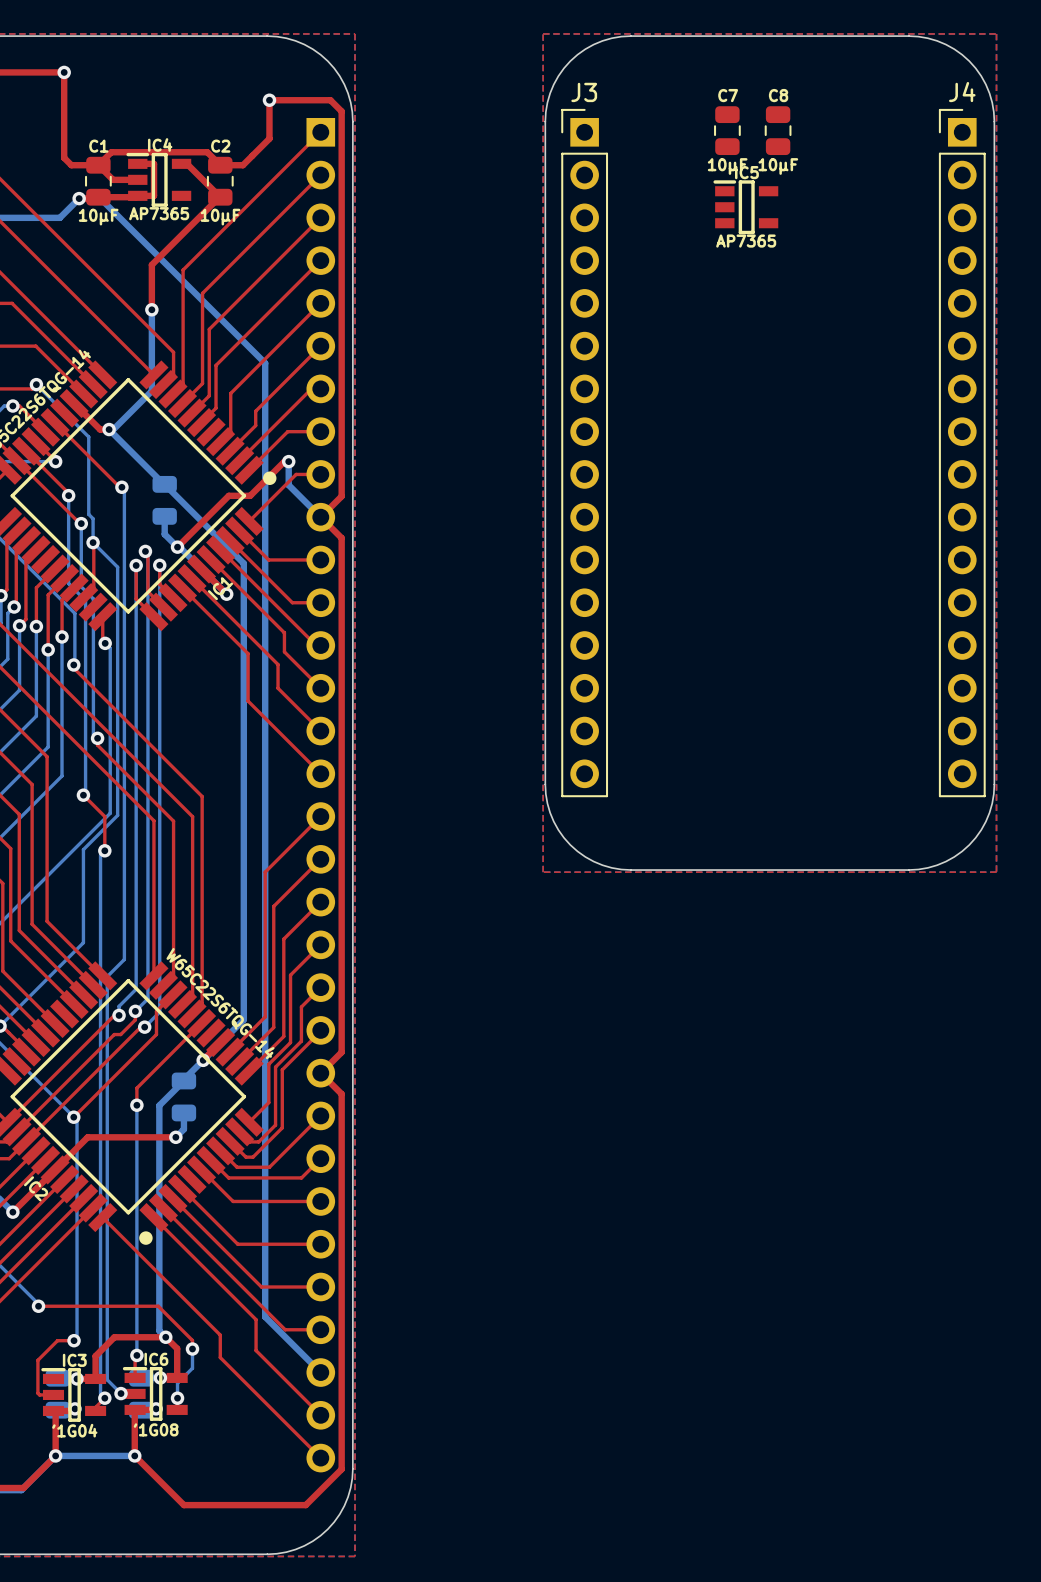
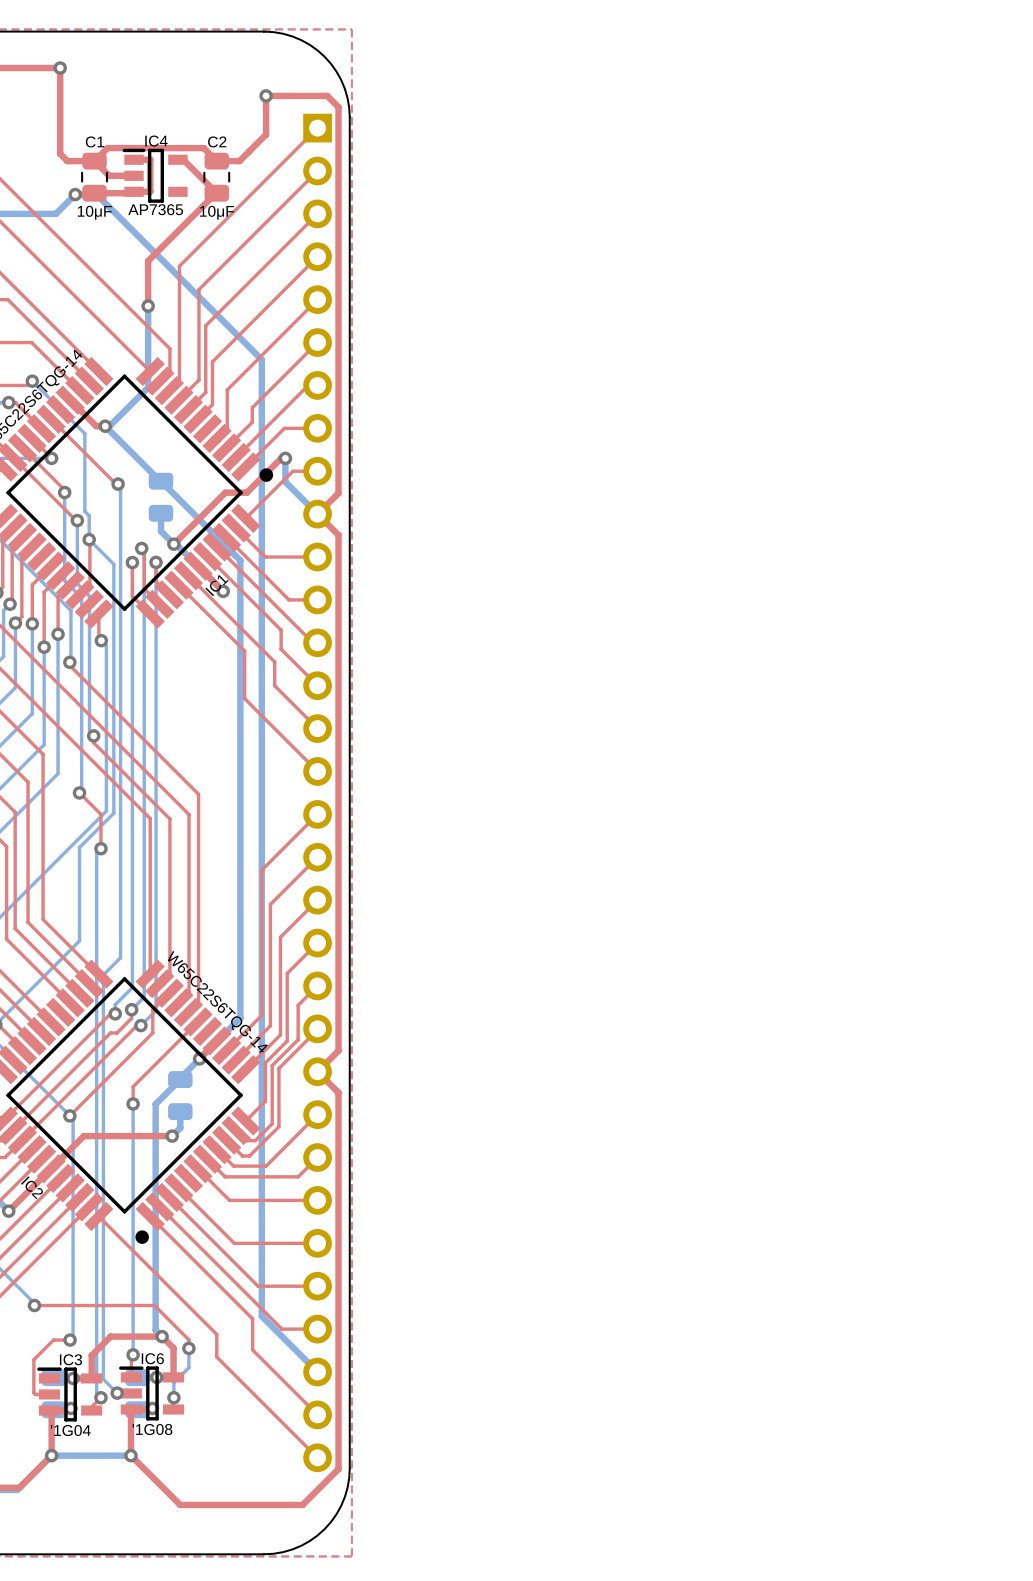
top zone outline: (543, 33) (996, 33) (996, 872) (543, 872) (543, 33) -> none
board edge: (630, 36) (918, 36) (945, 44) (962, 54) (975, 68) (989, 93) (994, 121) (993, 794) (985, 821) (975, 837) (962, 851) (937, 865) (908, 870) (621, 869) (593, 861) (577, 851) (558, 830) (550, 812) (545, 784) (545, 112) (553, 84) (563, 68) (577, 54) (602, 40) (630, 36) -> none
C7: 10μF (727, 130) -> none
C8: 10μF (778, 130) -> none
IC5: (745, 207) -> none
J3: (584, 453) -> none
J4: (962, 453) -> none

